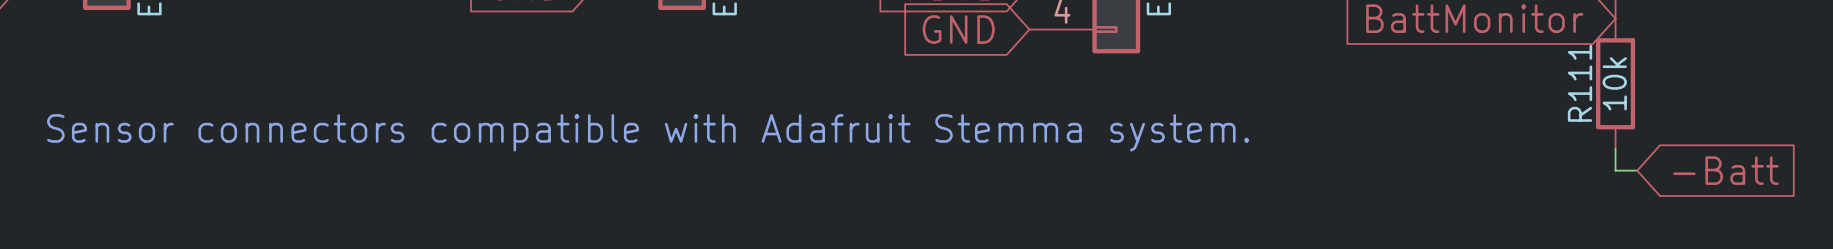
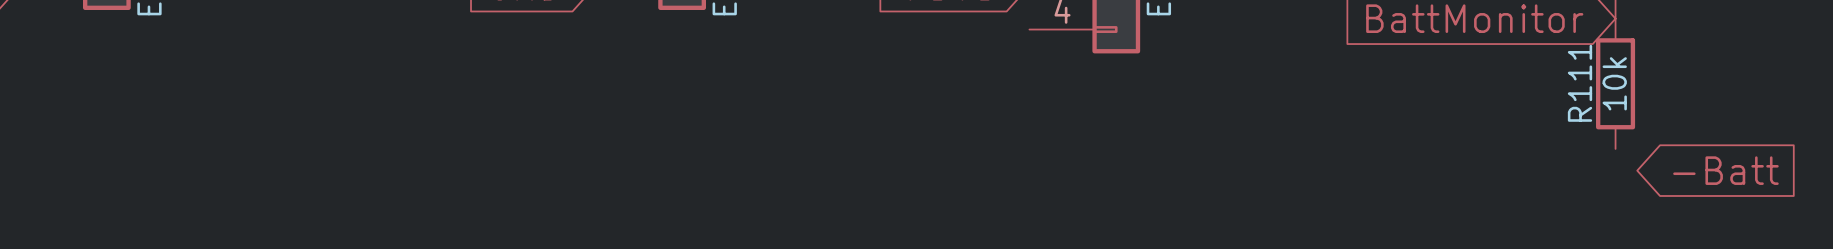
global label: GND (958, 29) -> none
text: Sensor connectors compatible with Adafruit Stemma system. (648, 132) -> none
wire: (1615, 148) (1615, 170) (1637, 170) -> none

